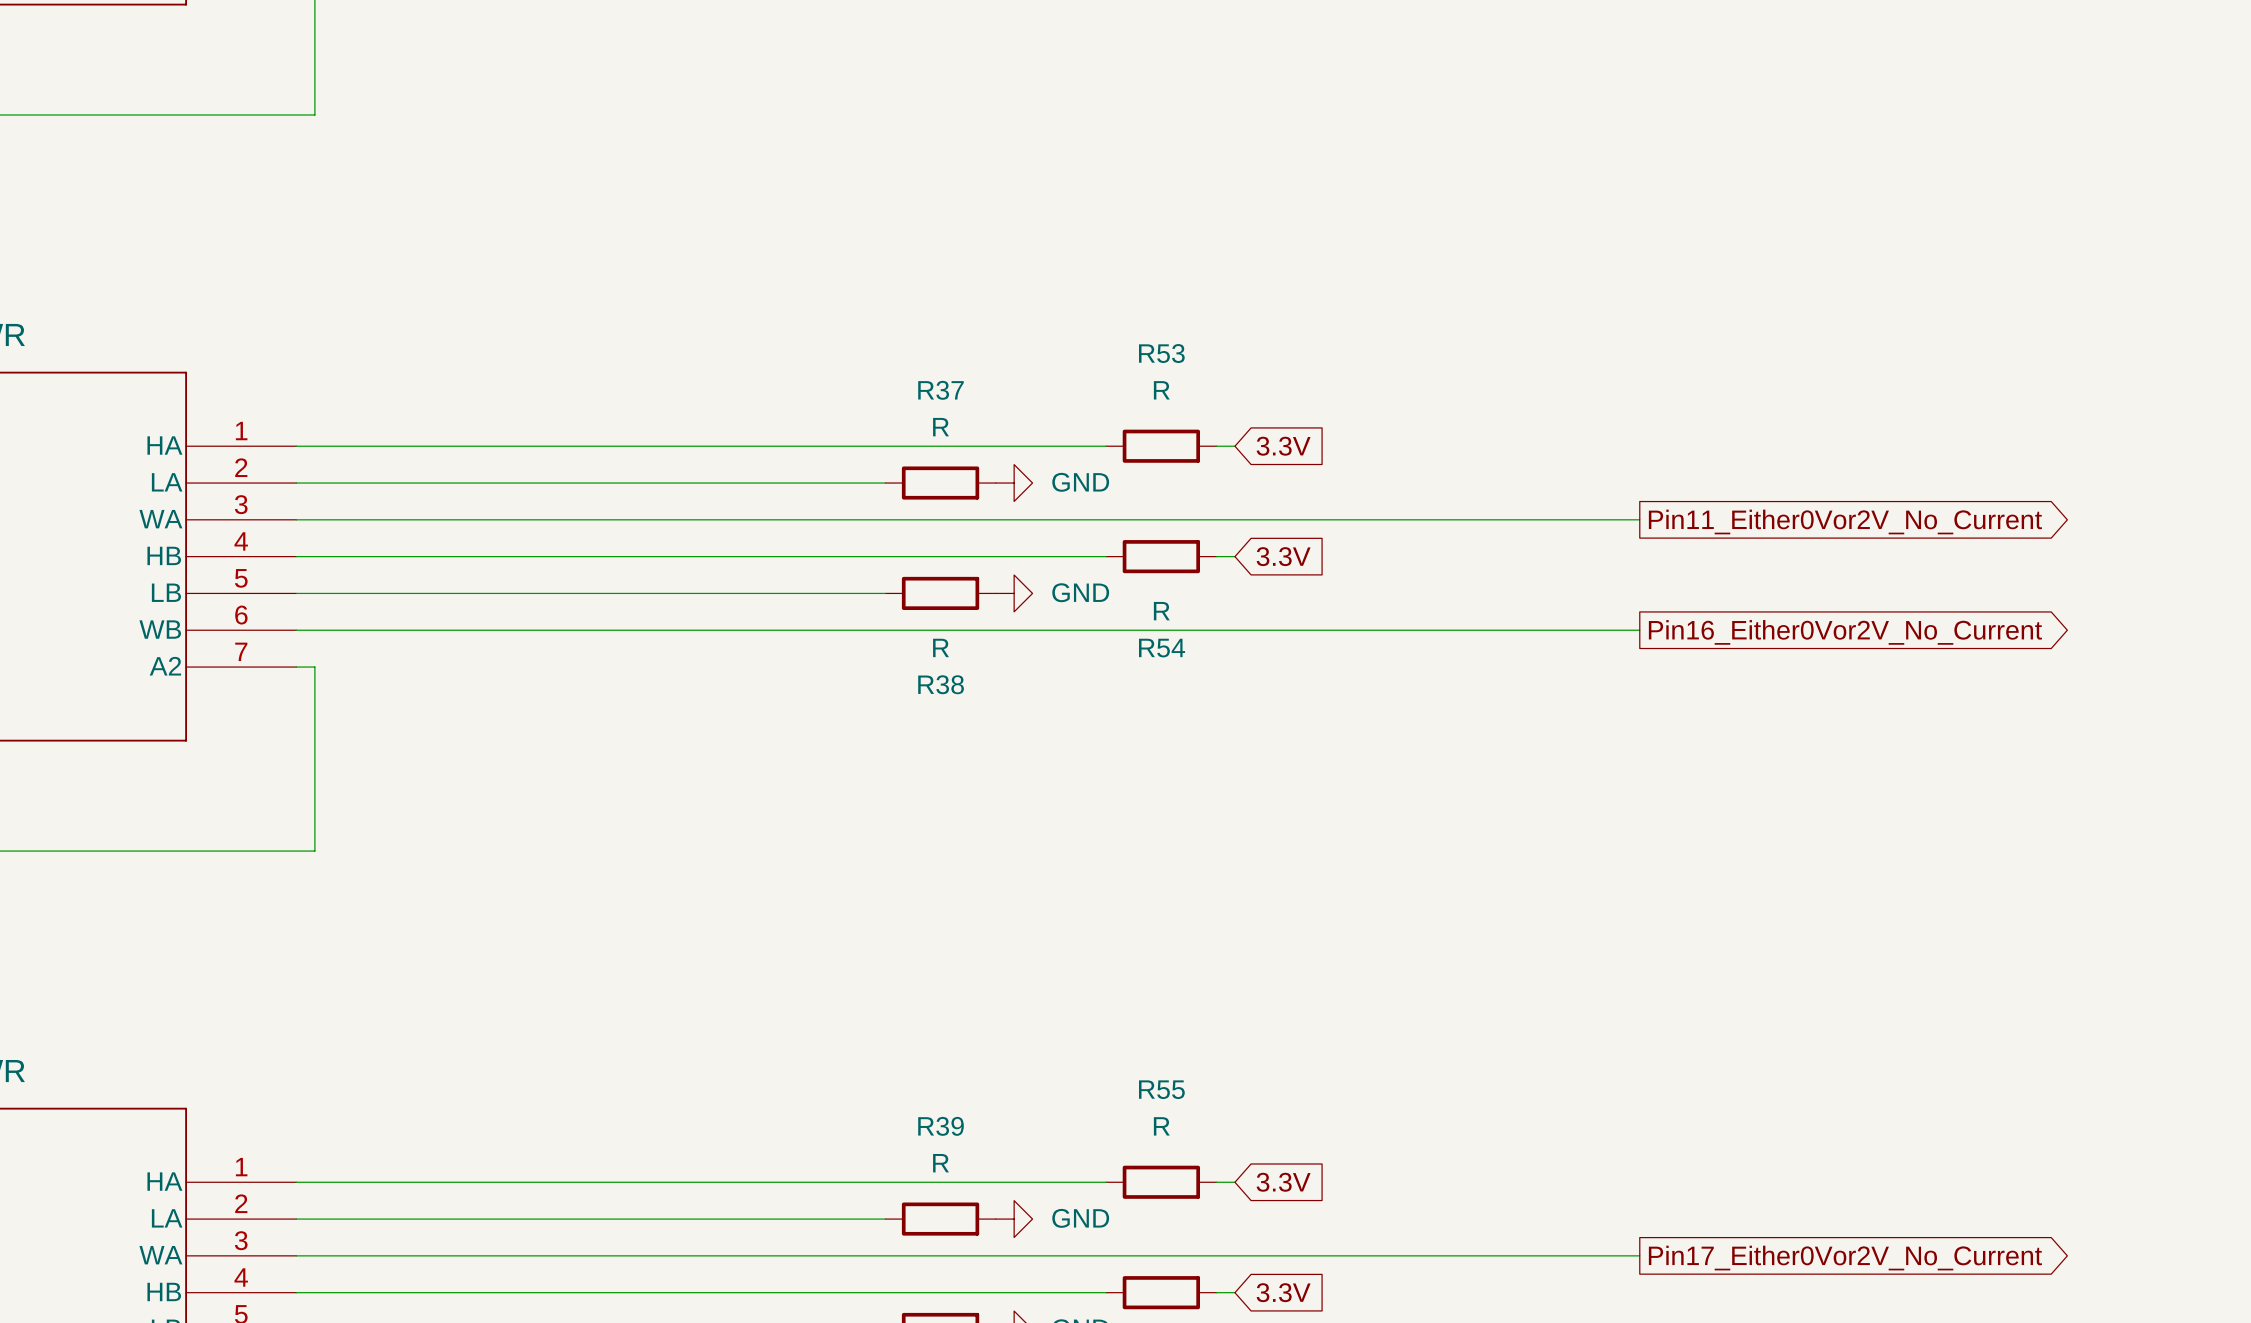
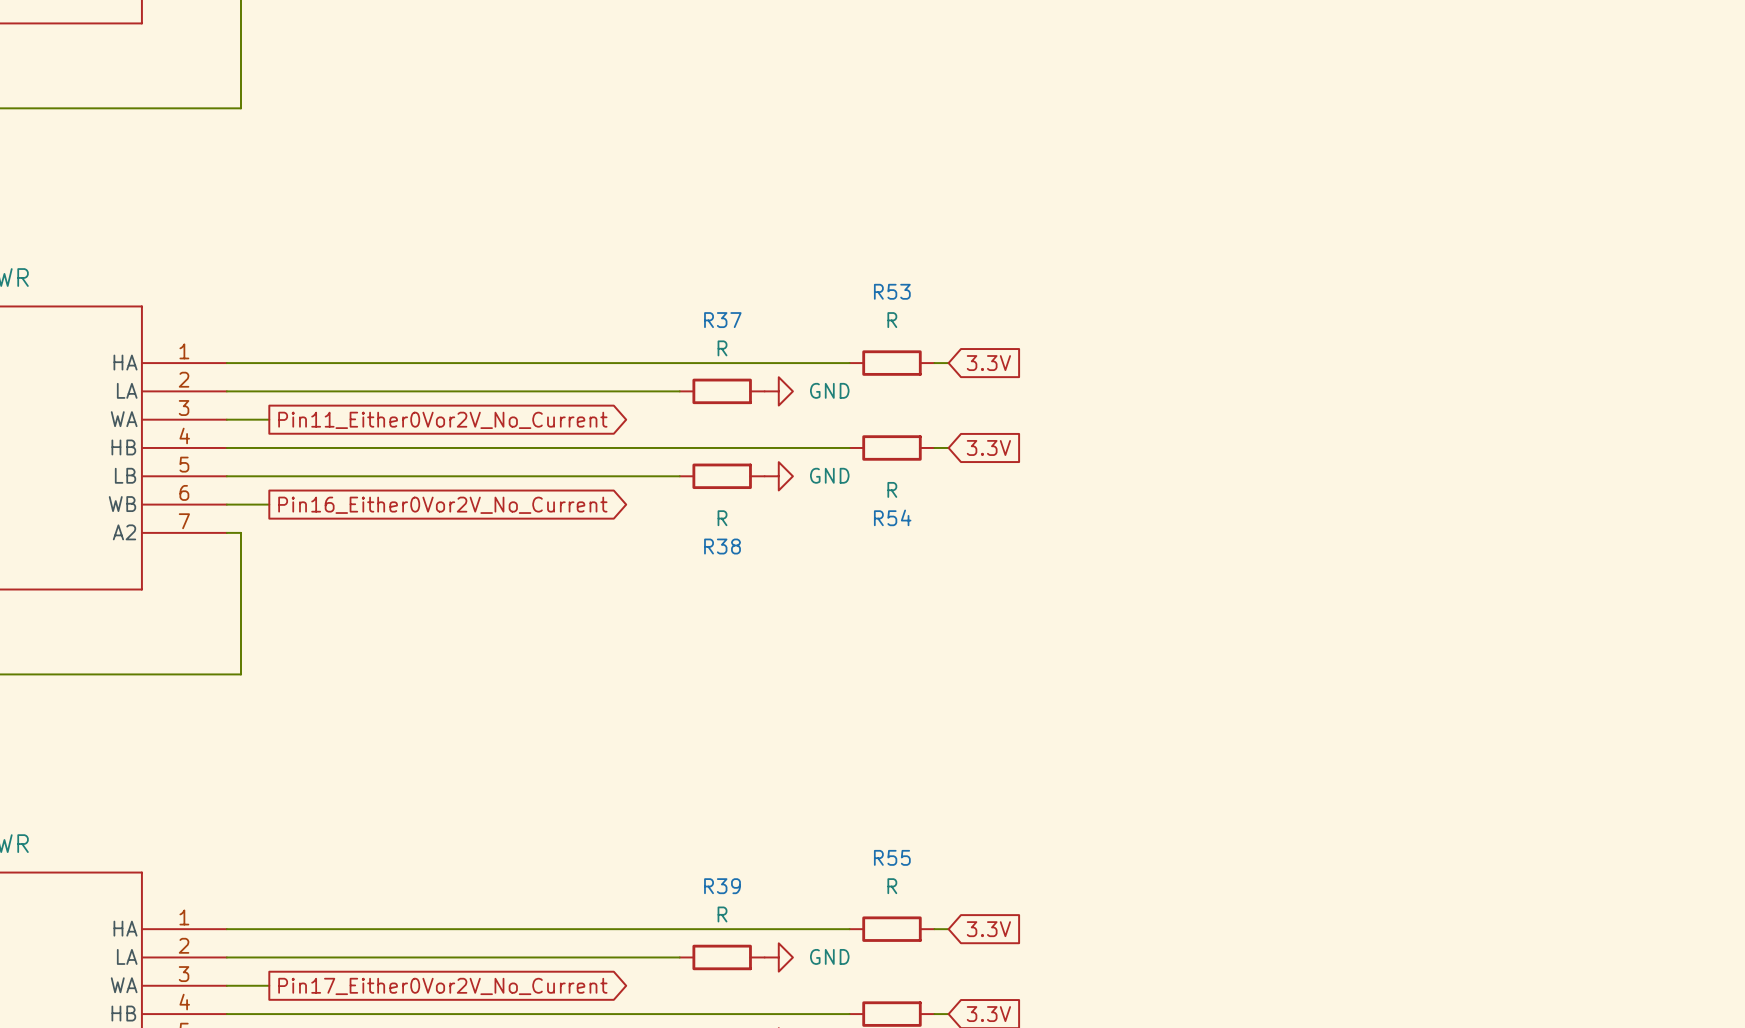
wire: (351, 519) (1639, 519) -> none
global label: none -> Pin11_Either0Vor2V_No_Current (442, 420)
global label: Pin11_Either0Vor2V_No_Current (1845, 521) -> none
wire: (351, 630) (1639, 630) -> none
global label: none -> Pin16_Either0Vor2V_No_Current (442, 505)
global label: Pin16_Either0Vor2V_No_Current (1845, 632) -> none
wire: (351, 1255) (1639, 1255) -> none
global label: none -> Pin17_Either0Vor2V_No_Current (442, 986)
global label: Pin17_Either0Vor2V_No_Current (1845, 1258) -> none

